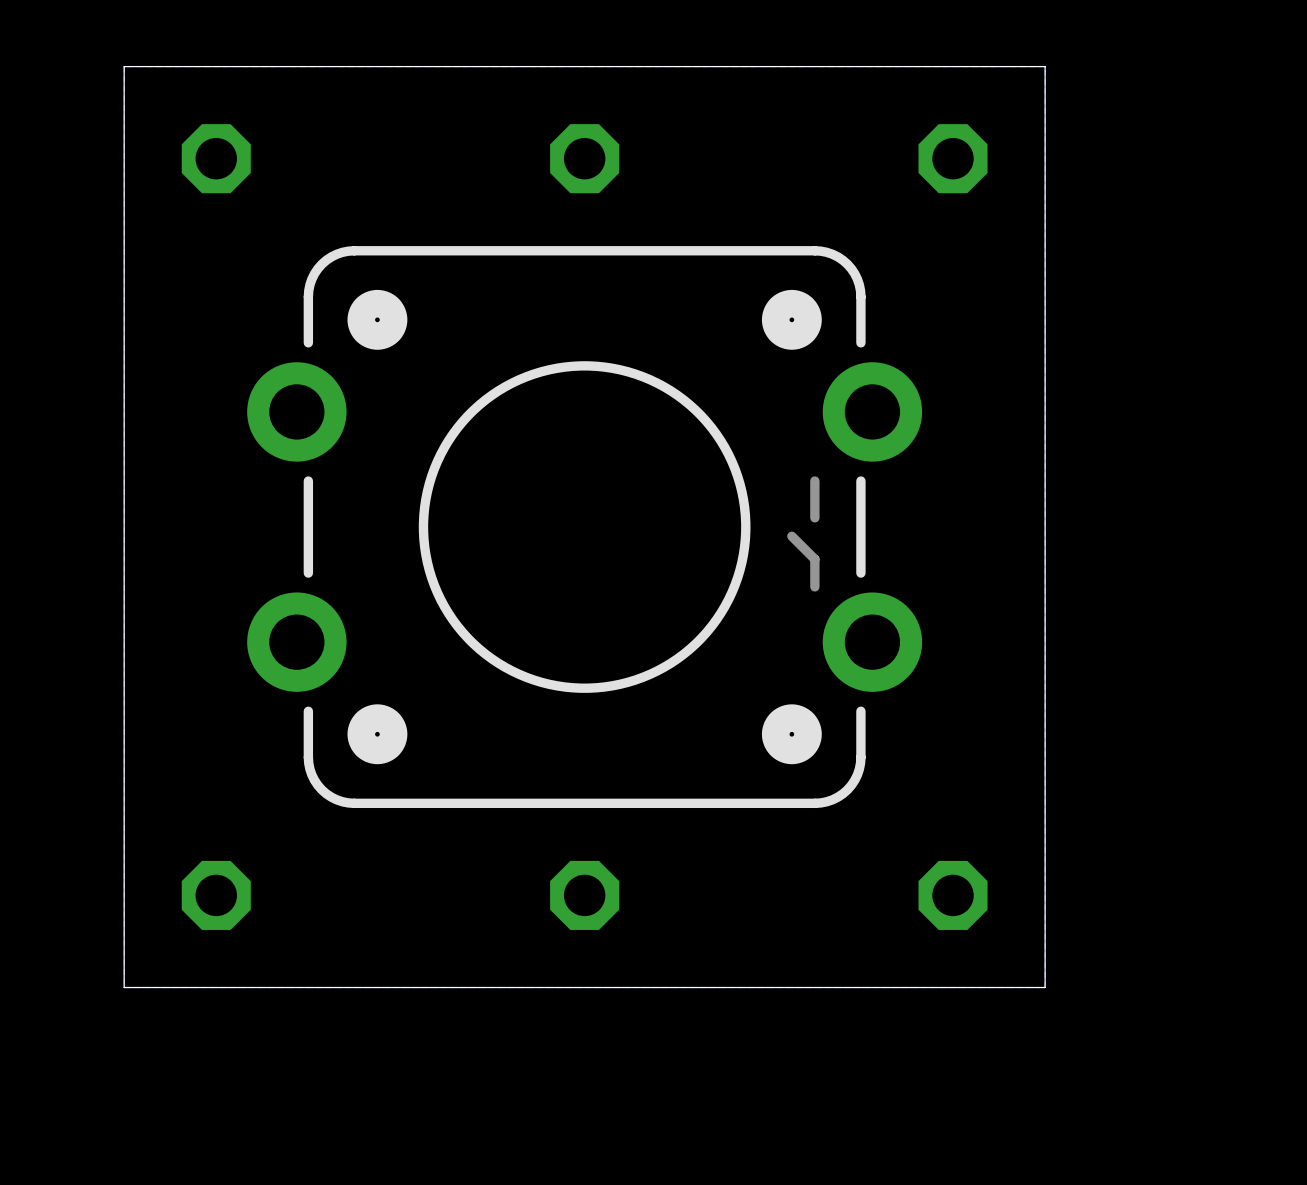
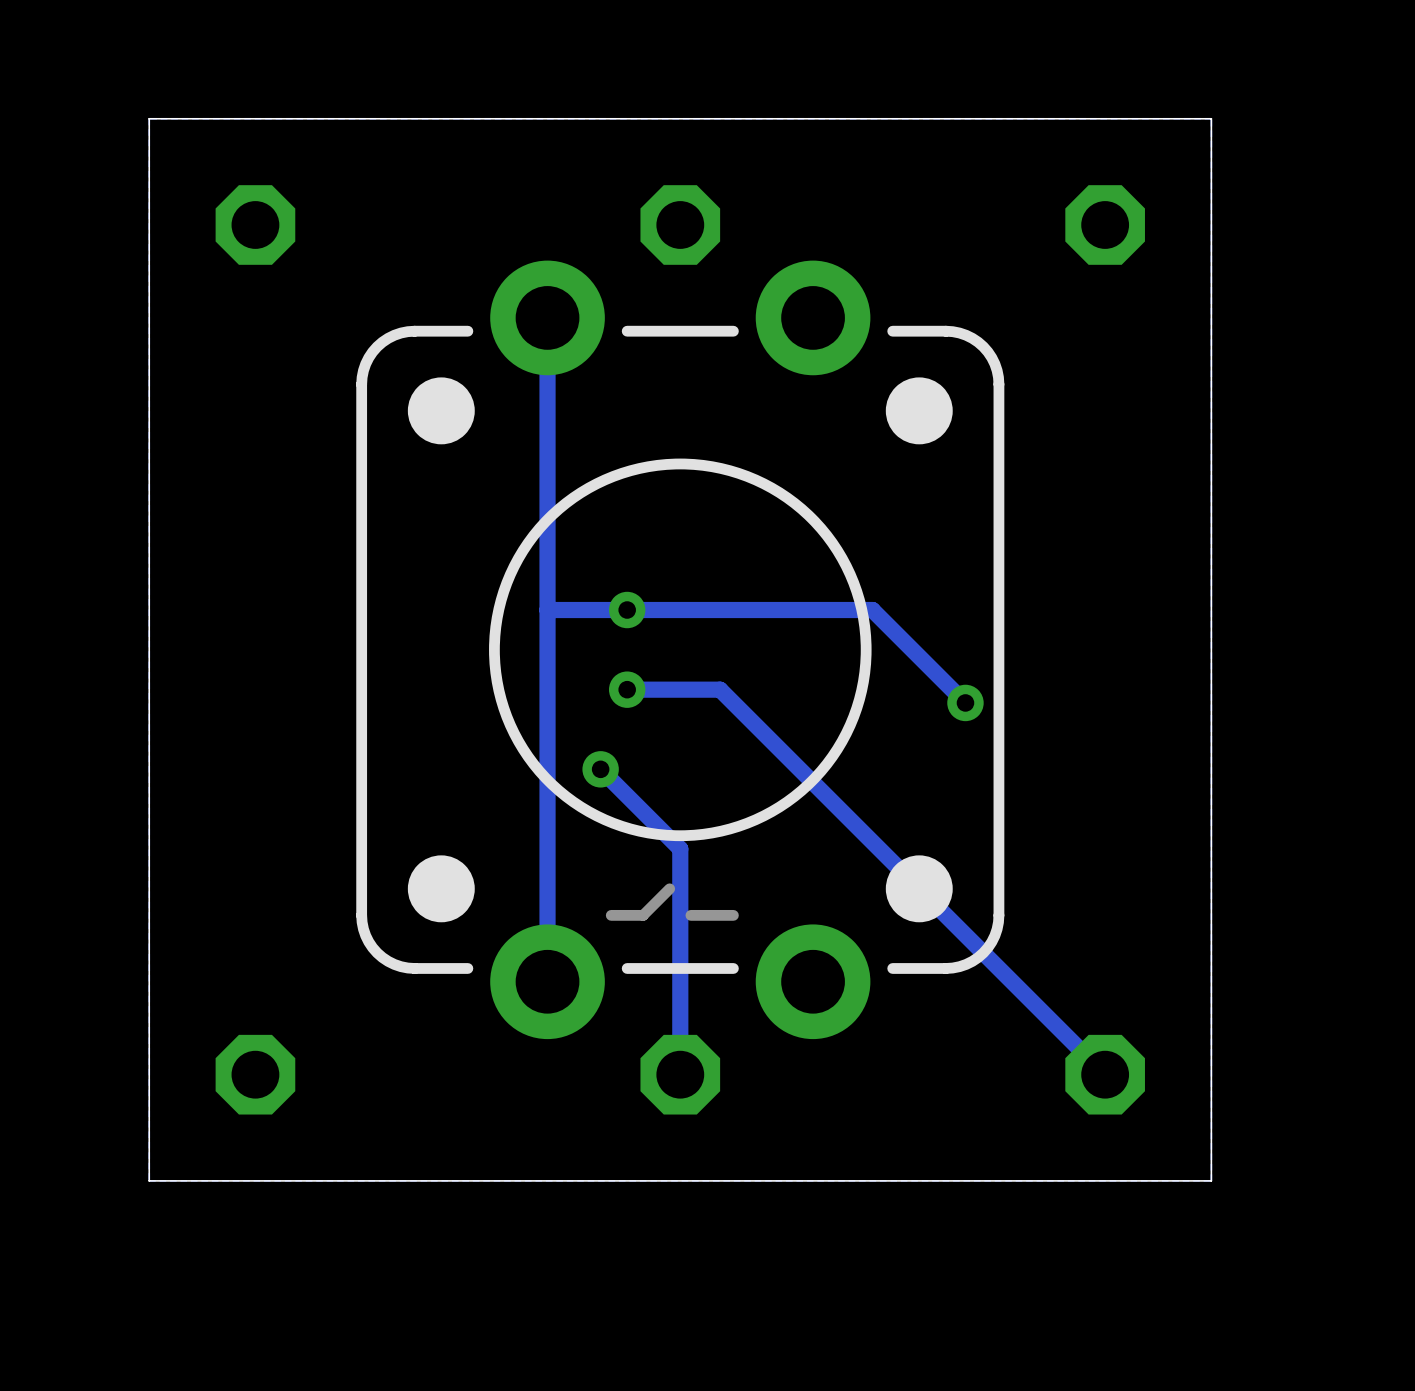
track: none -> (547, 317) (547, 981)
part footprint: [247, 246, 923, 809] -> [356, 260, 1005, 1040]
track: none -> (547, 610) (872, 610) (965, 702)
via: none -> (627, 610)
track: none -> (627, 689) (720, 689) (1105, 1074)
via: none -> (627, 689)
via: none -> (965, 702)
track: none -> (600, 769) (680, 848) (680, 1074)
via: none -> (600, 769)

